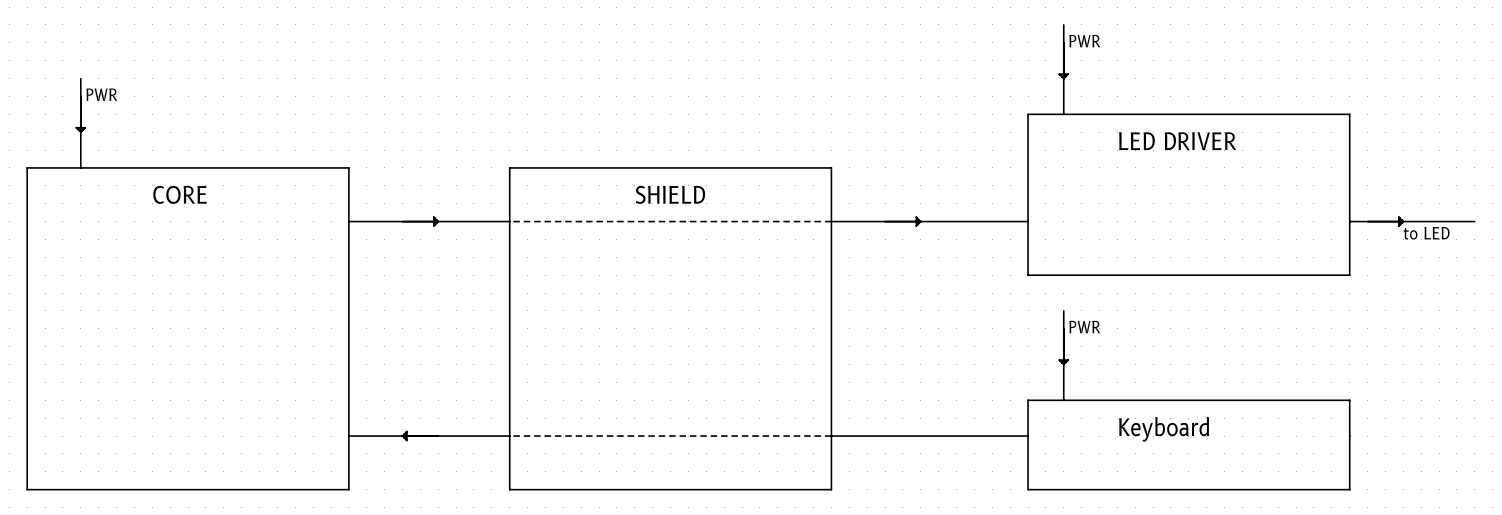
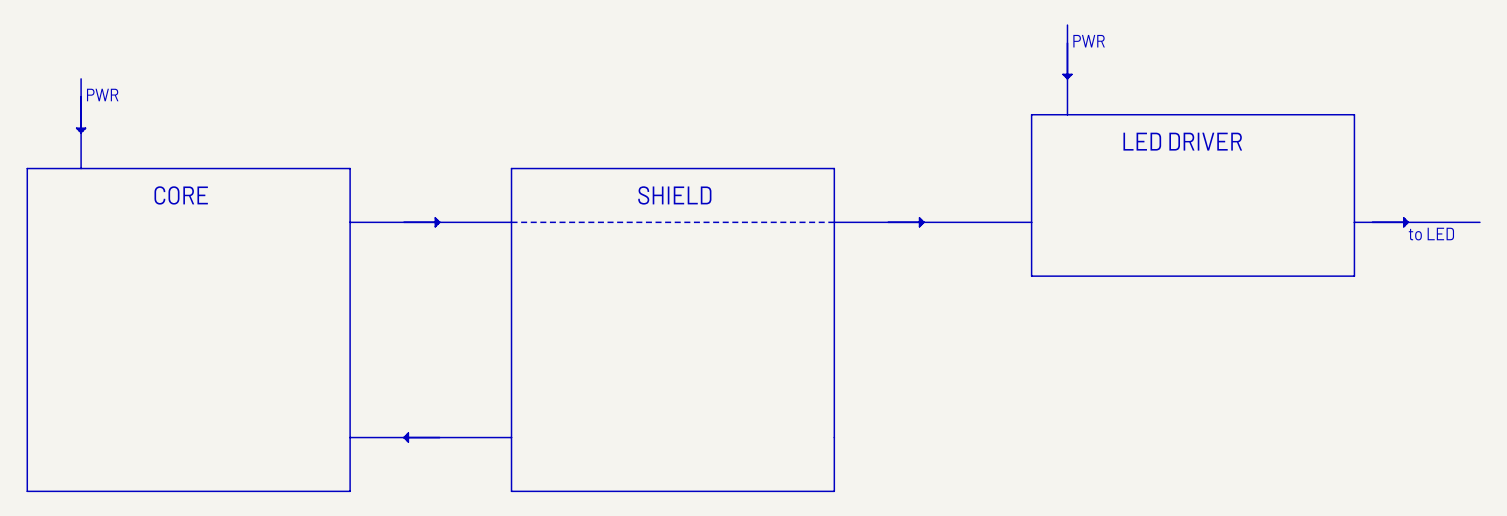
line: (1063, 310) (1063, 400) -> none
text: PWR (1084, 327) -> none
part: (1063, 346) -> none
line: (1028, 400) (1349, 400) (1349, 489) (1028, 489) (1028, 400) -> none
text: Keyboard (1164, 429) -> none
line: (509, 436) (1028, 436) -> none

